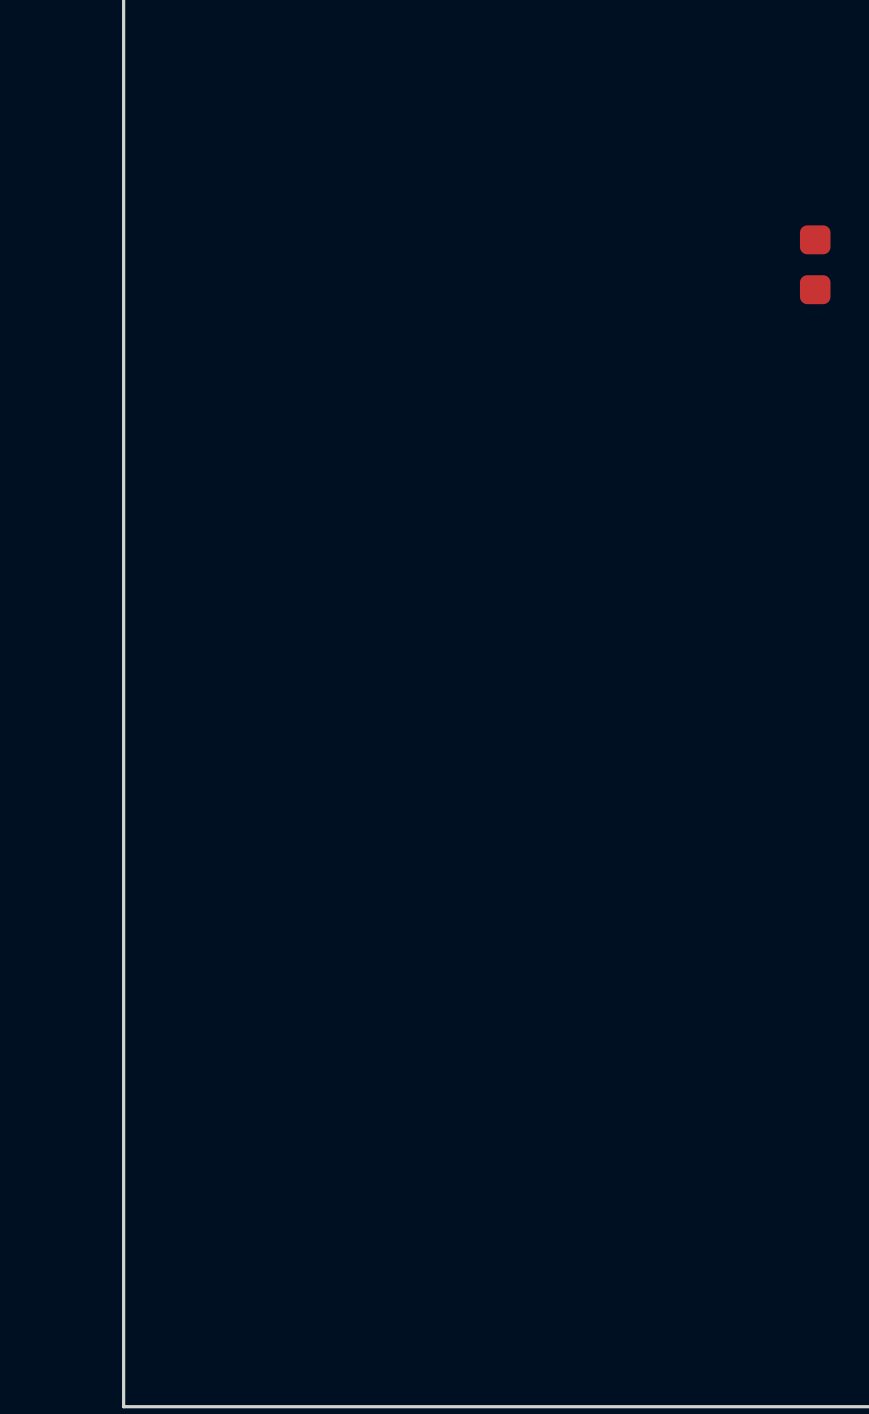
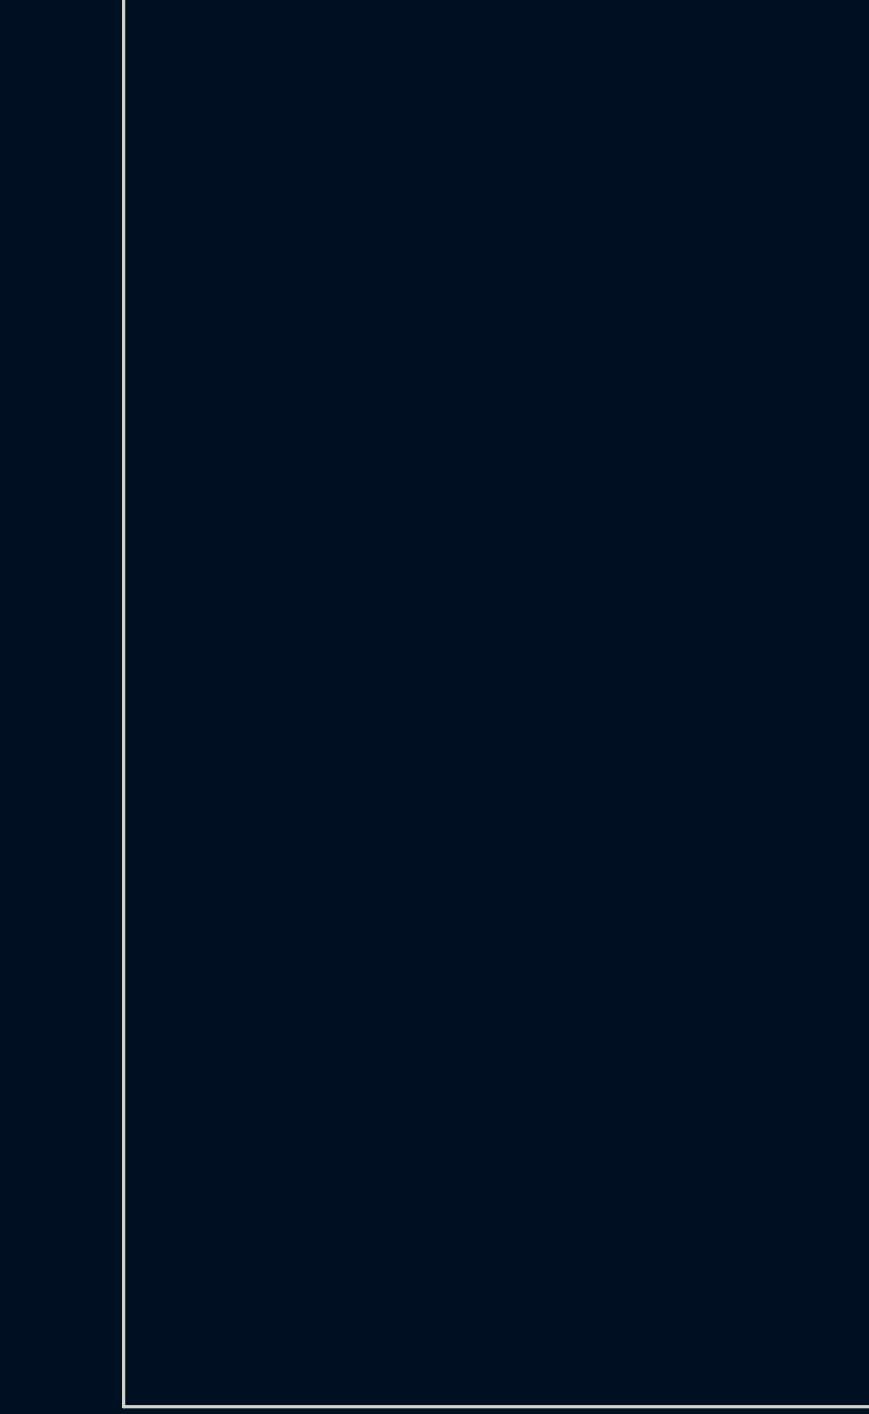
part: (815, 264) -> none

